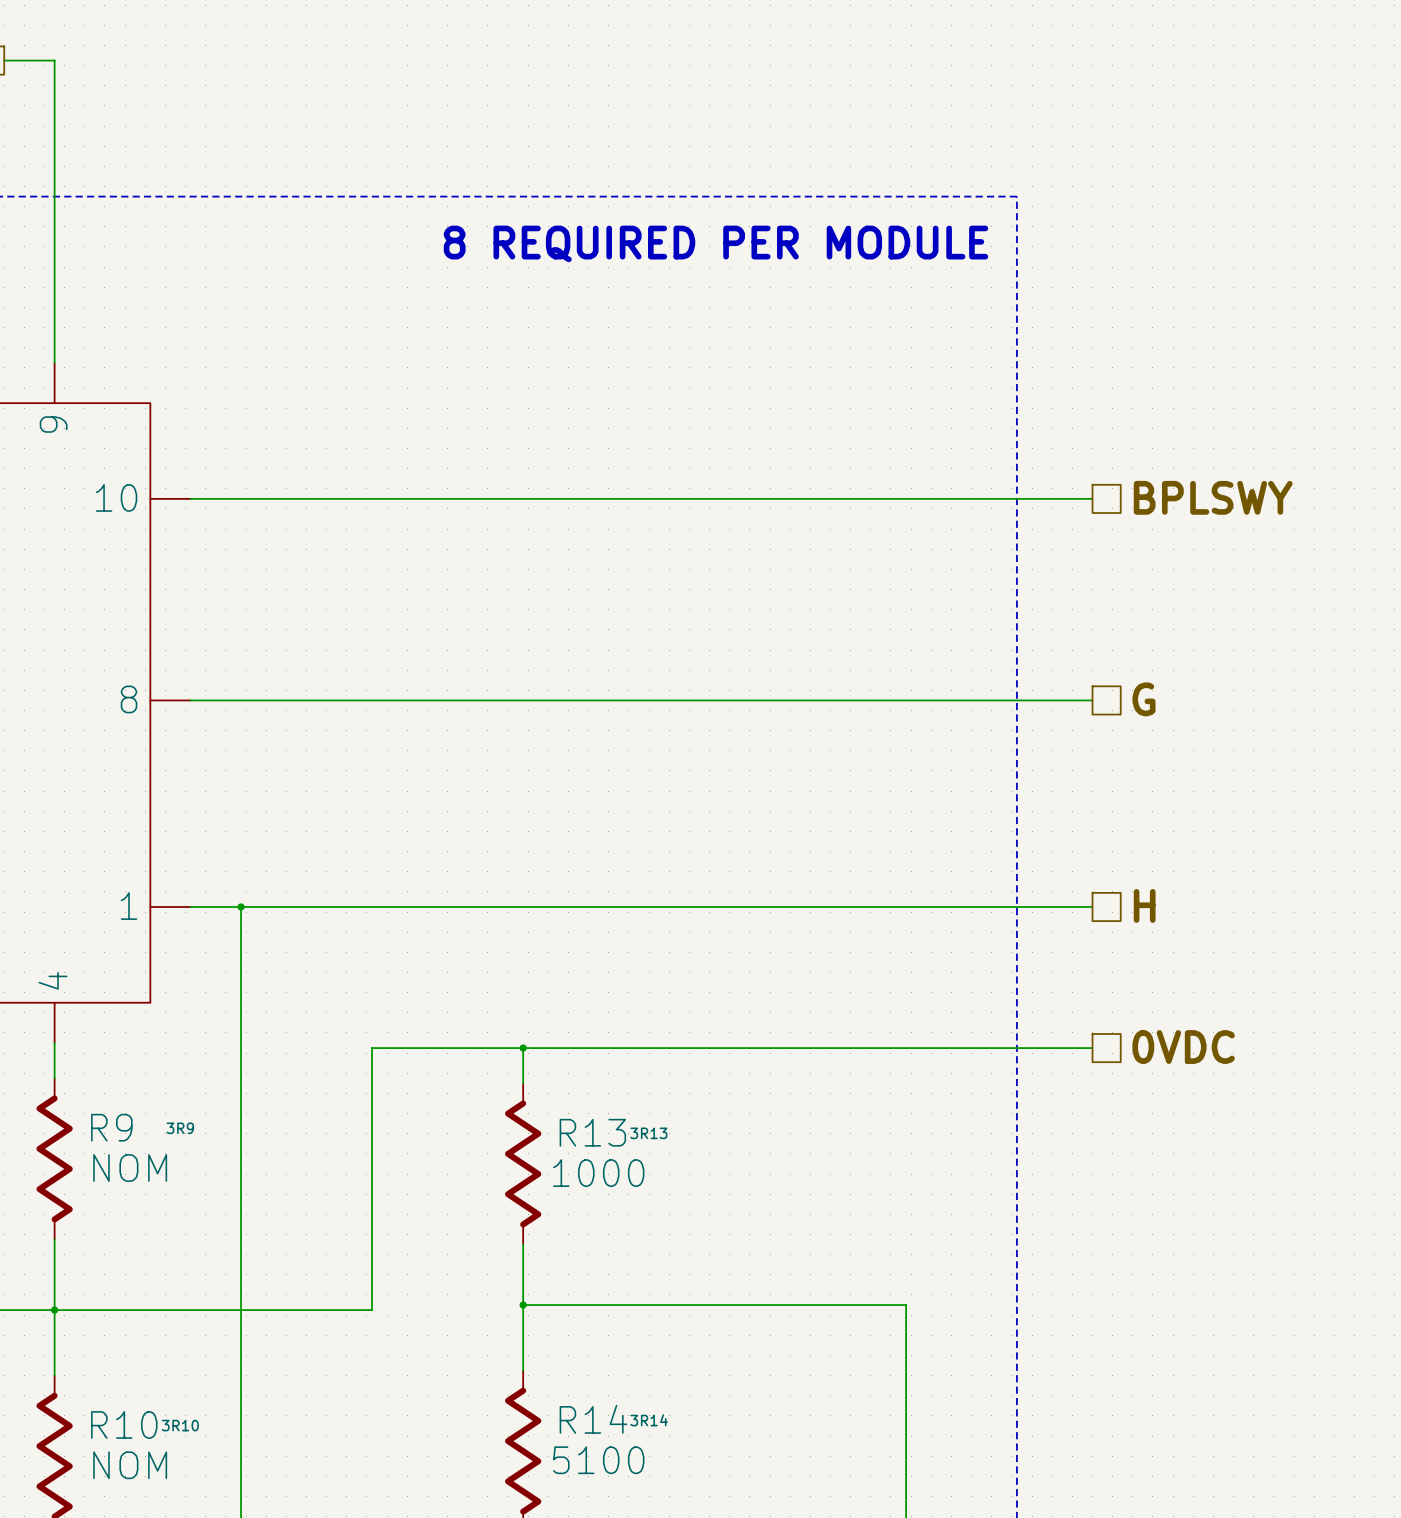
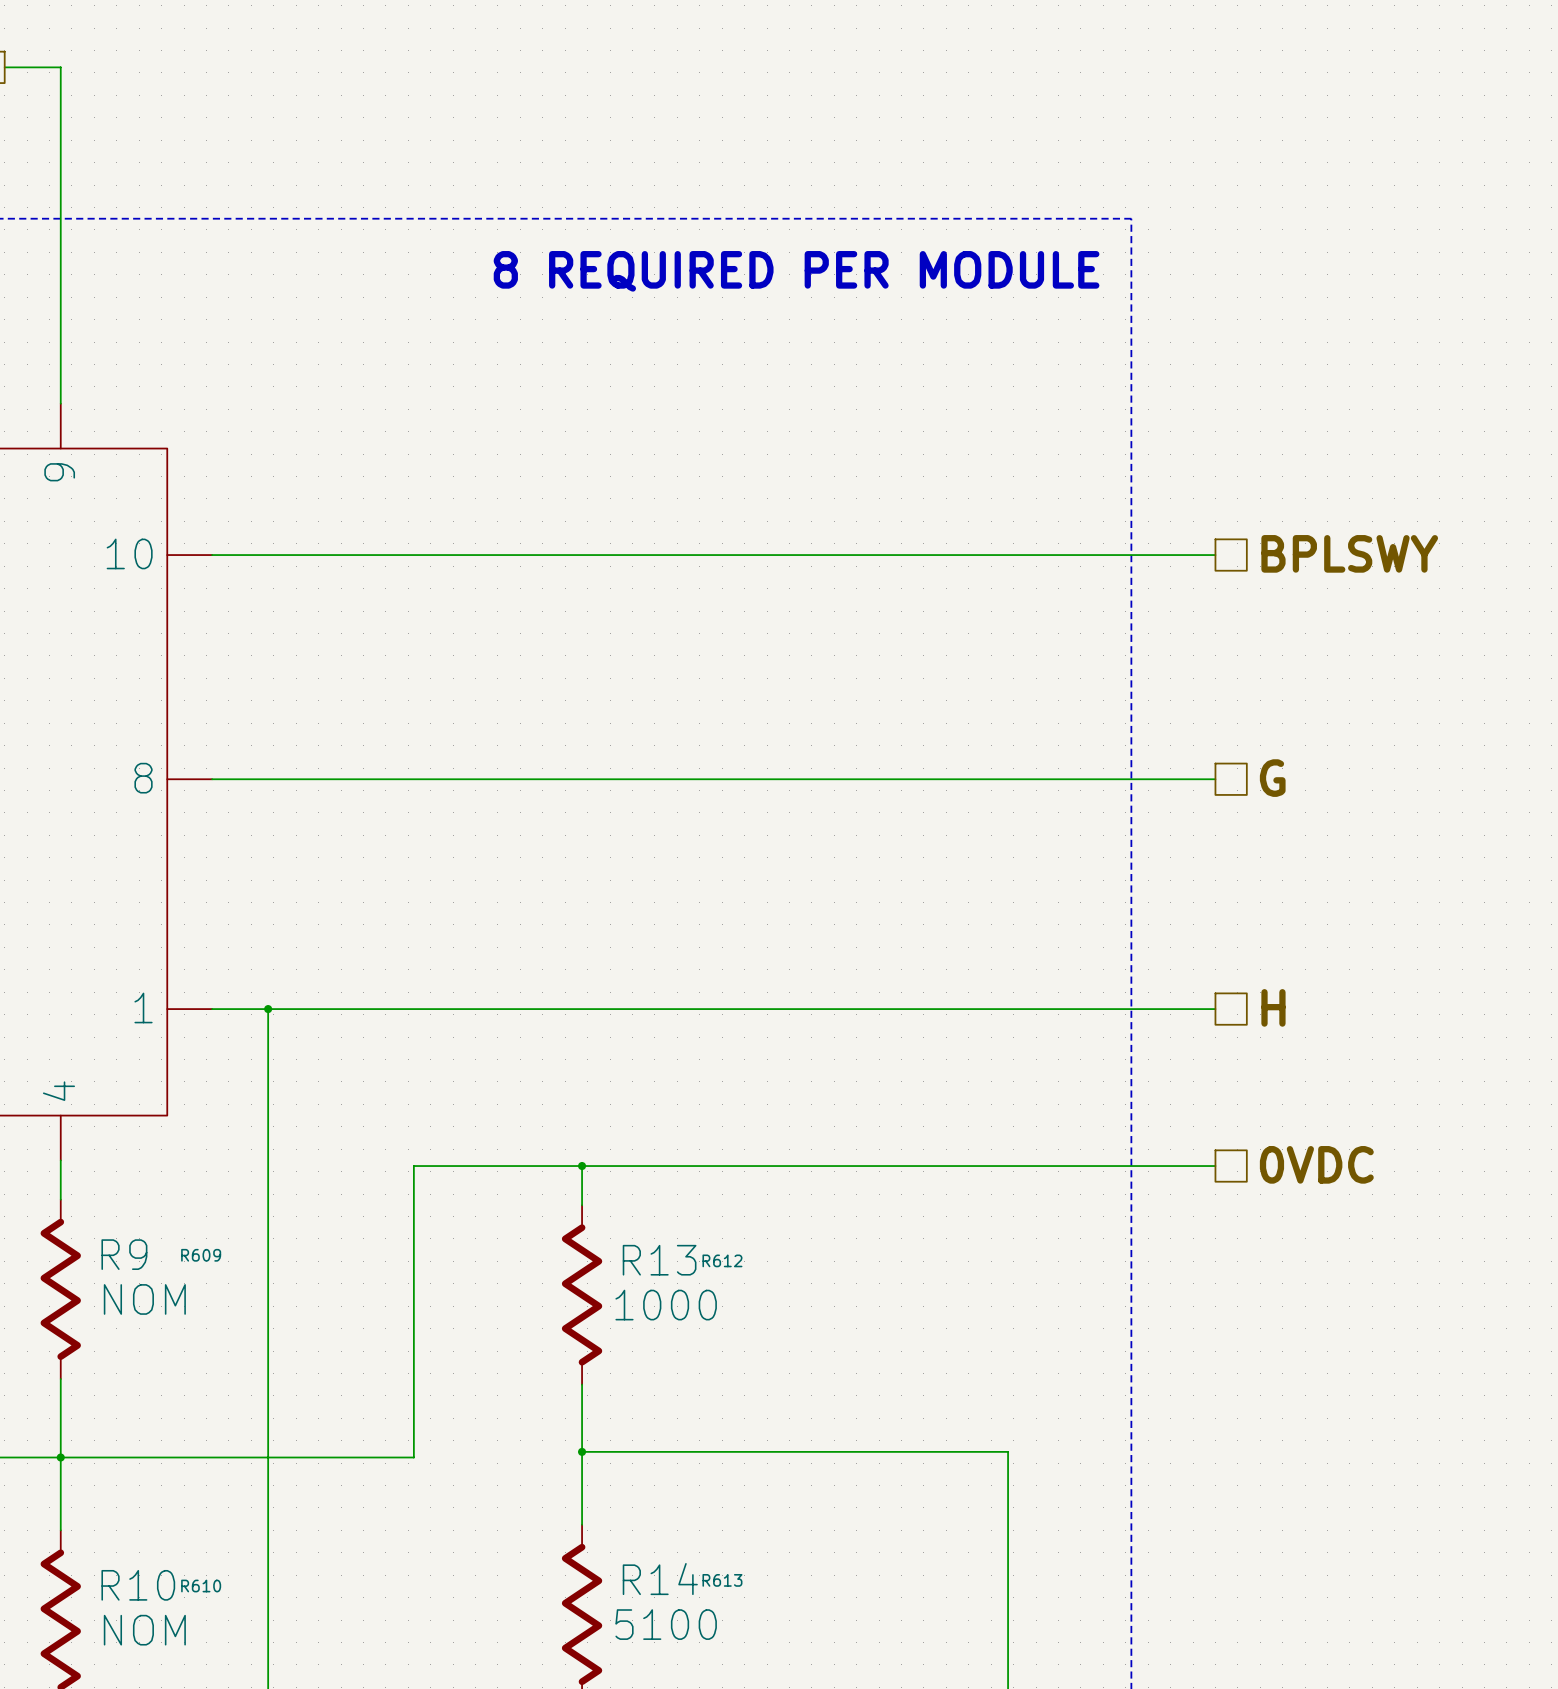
3R9 name: 3R9 (180, 1128) -> R609 (201, 1255)
3R13 name: 3R13 (648, 1133) -> R612 (722, 1260)
3R14 name: 3R14 (649, 1420) -> R613 (722, 1580)
3R10 name: 3R10 (180, 1425) -> R610 (201, 1586)

